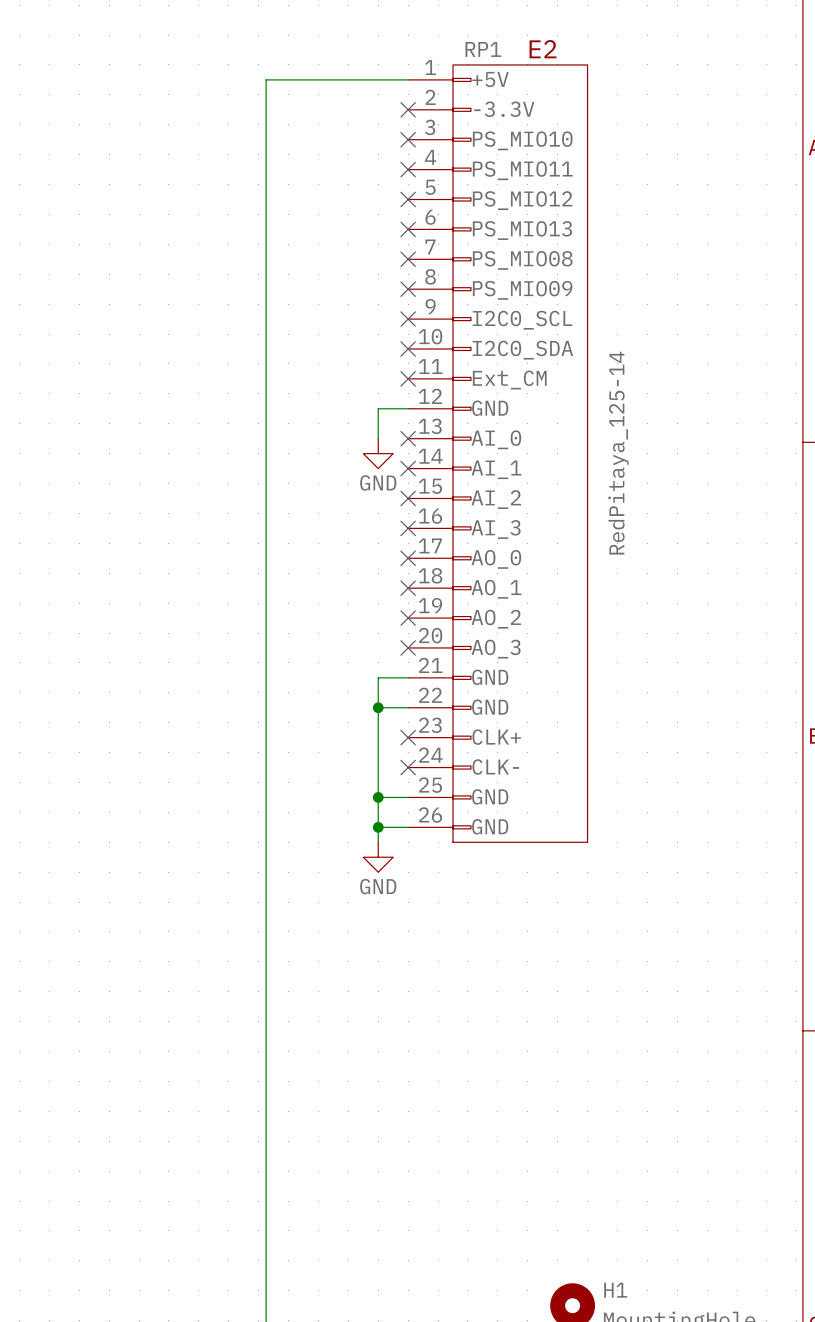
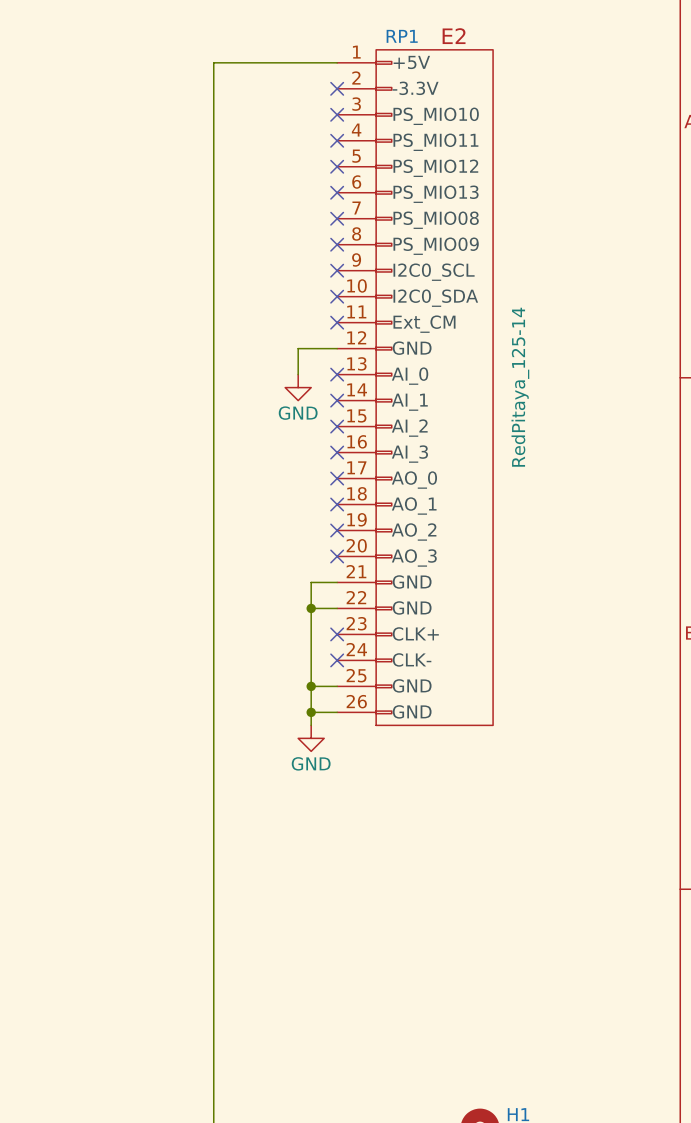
wire: (378, 408) (378, 438) -> (311, 348) (298, 348) (298, 374)
power symbol position: GND (378, 453) -> GND (298, 387)

